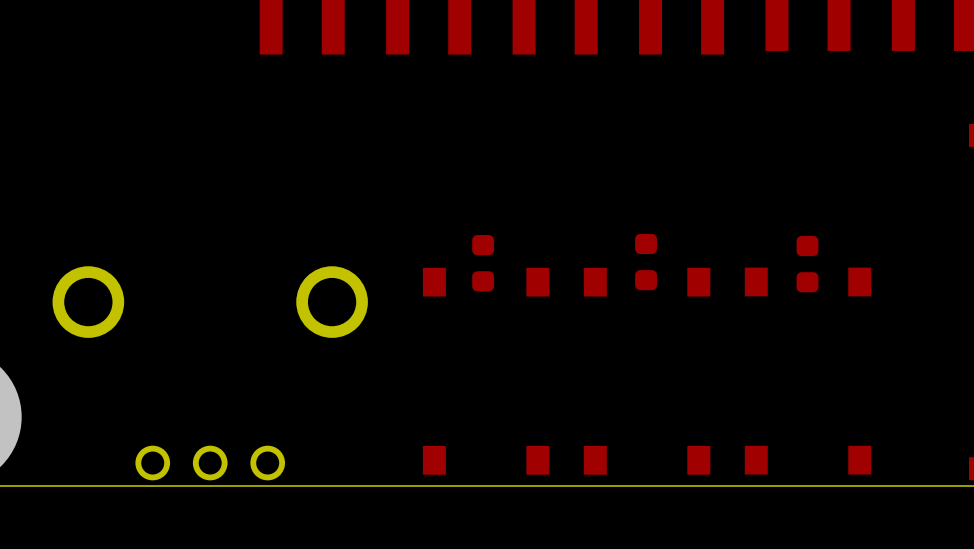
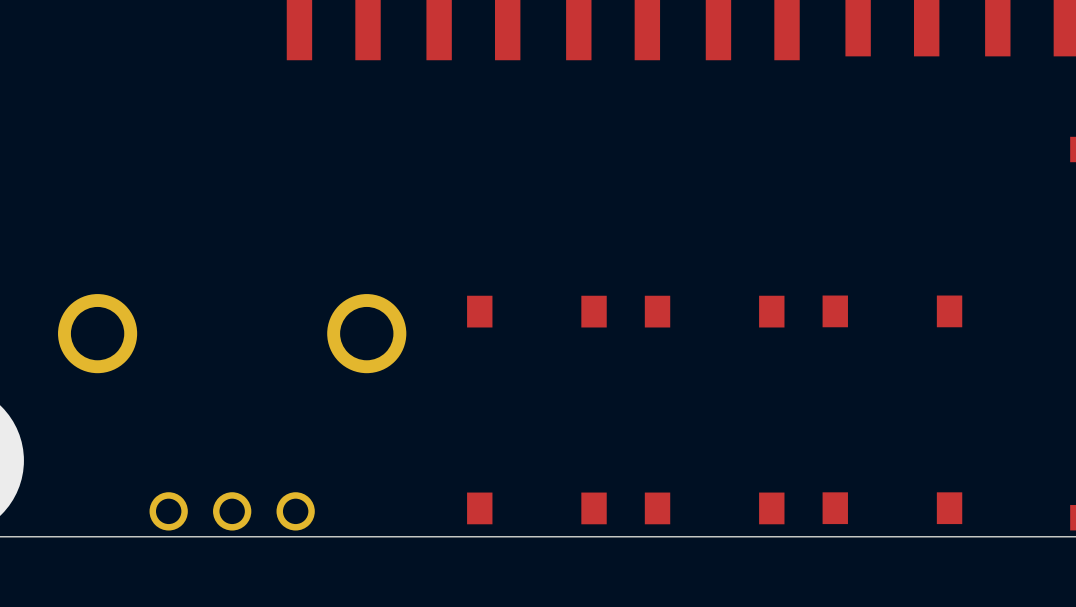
part: (646, 262) -> none
part: (483, 263) -> none
part: (807, 264) -> none

